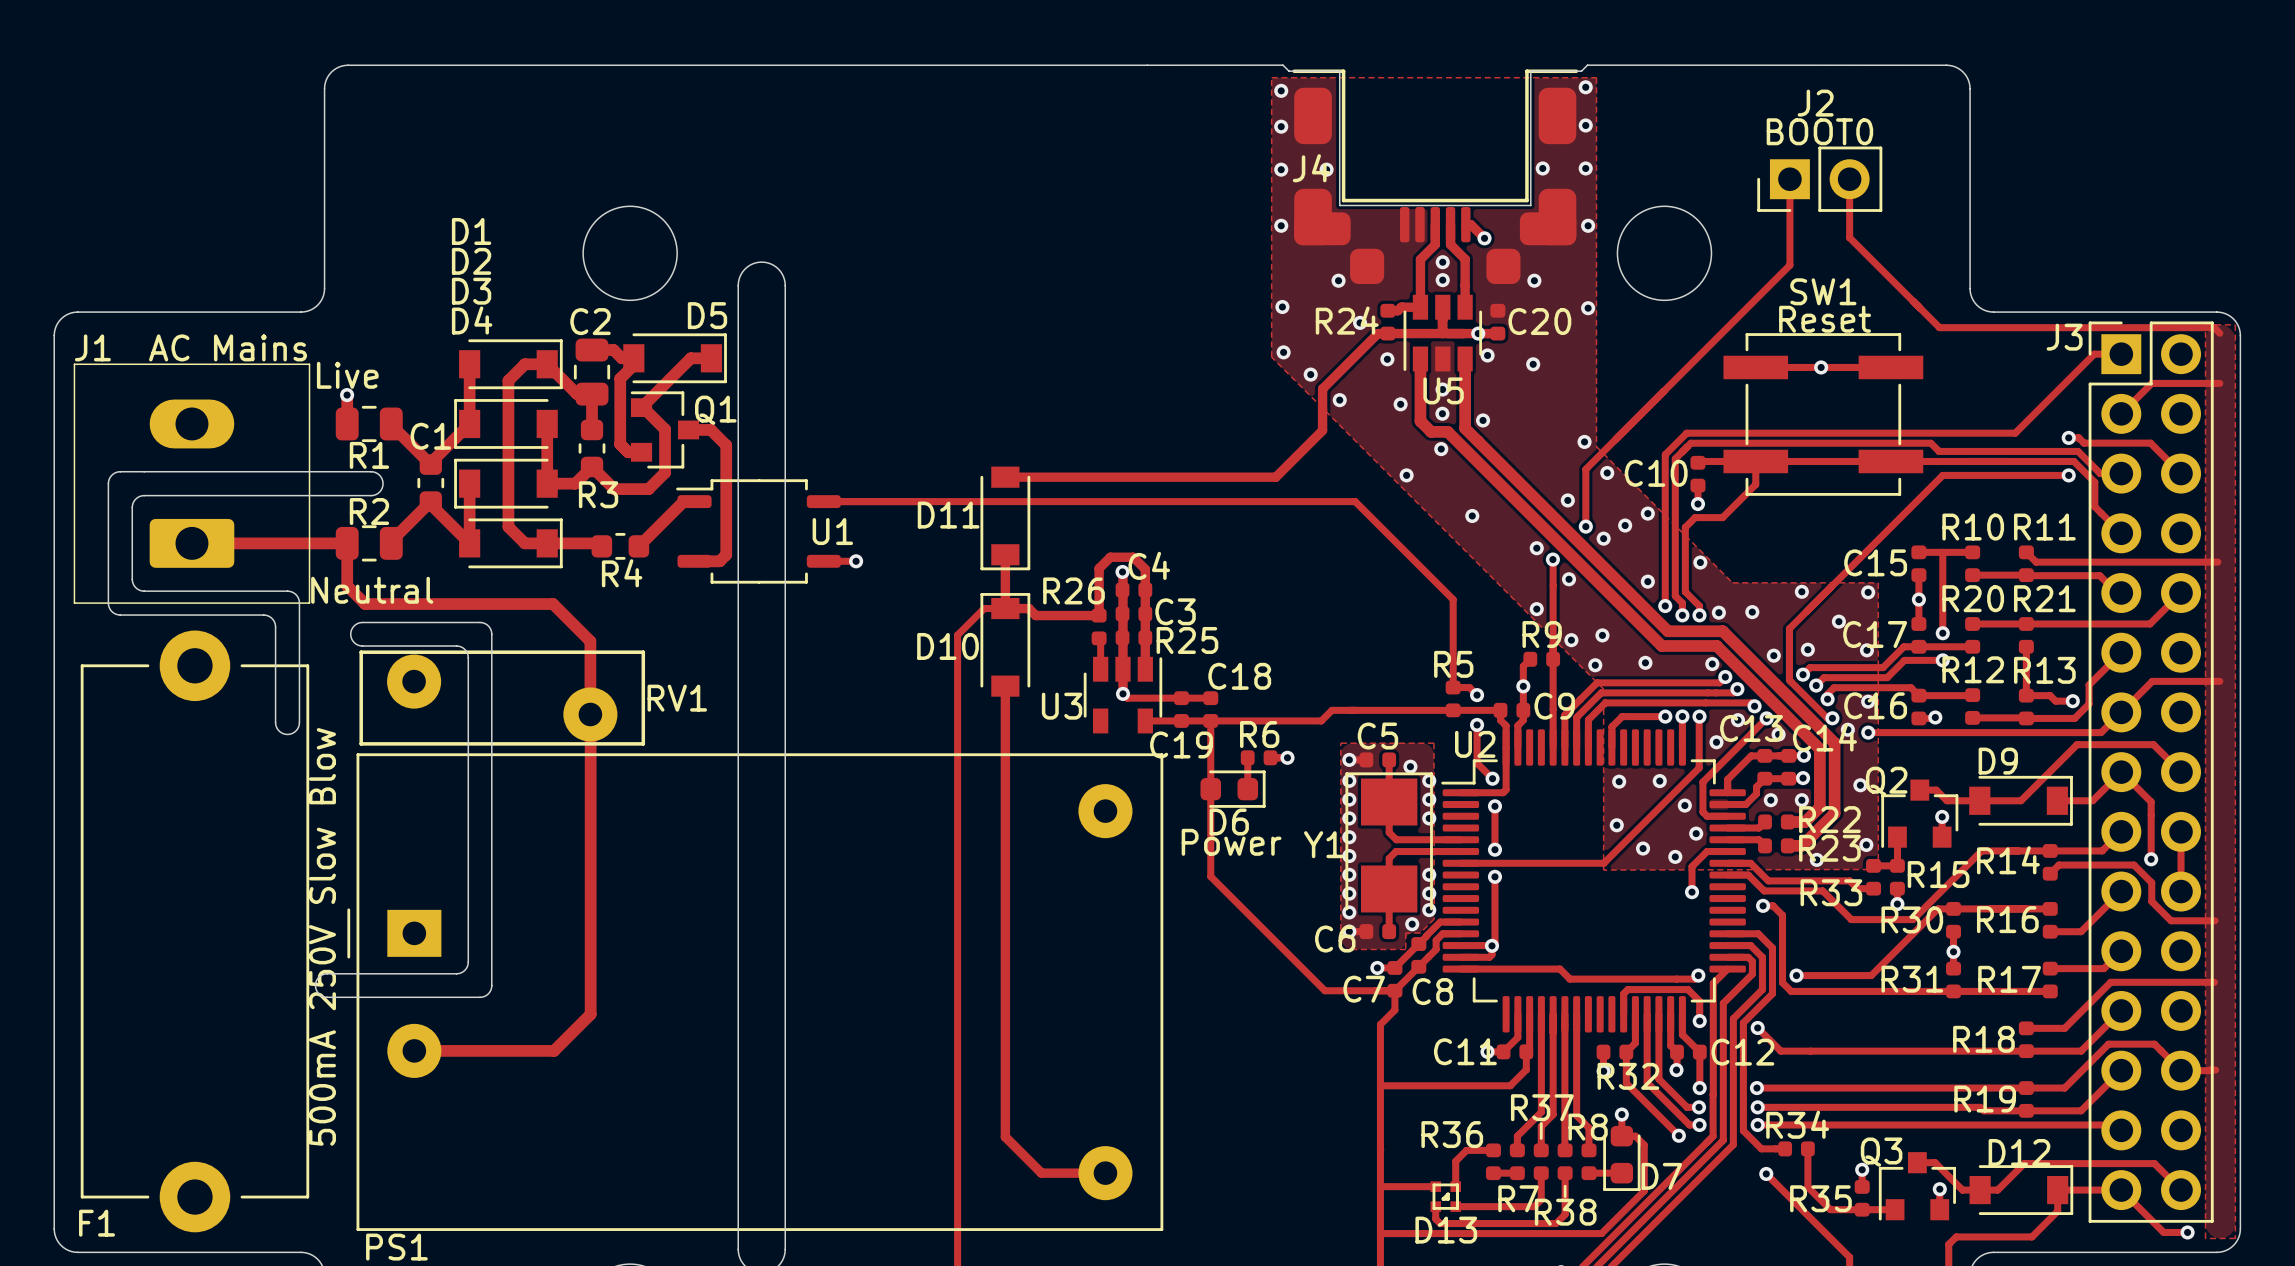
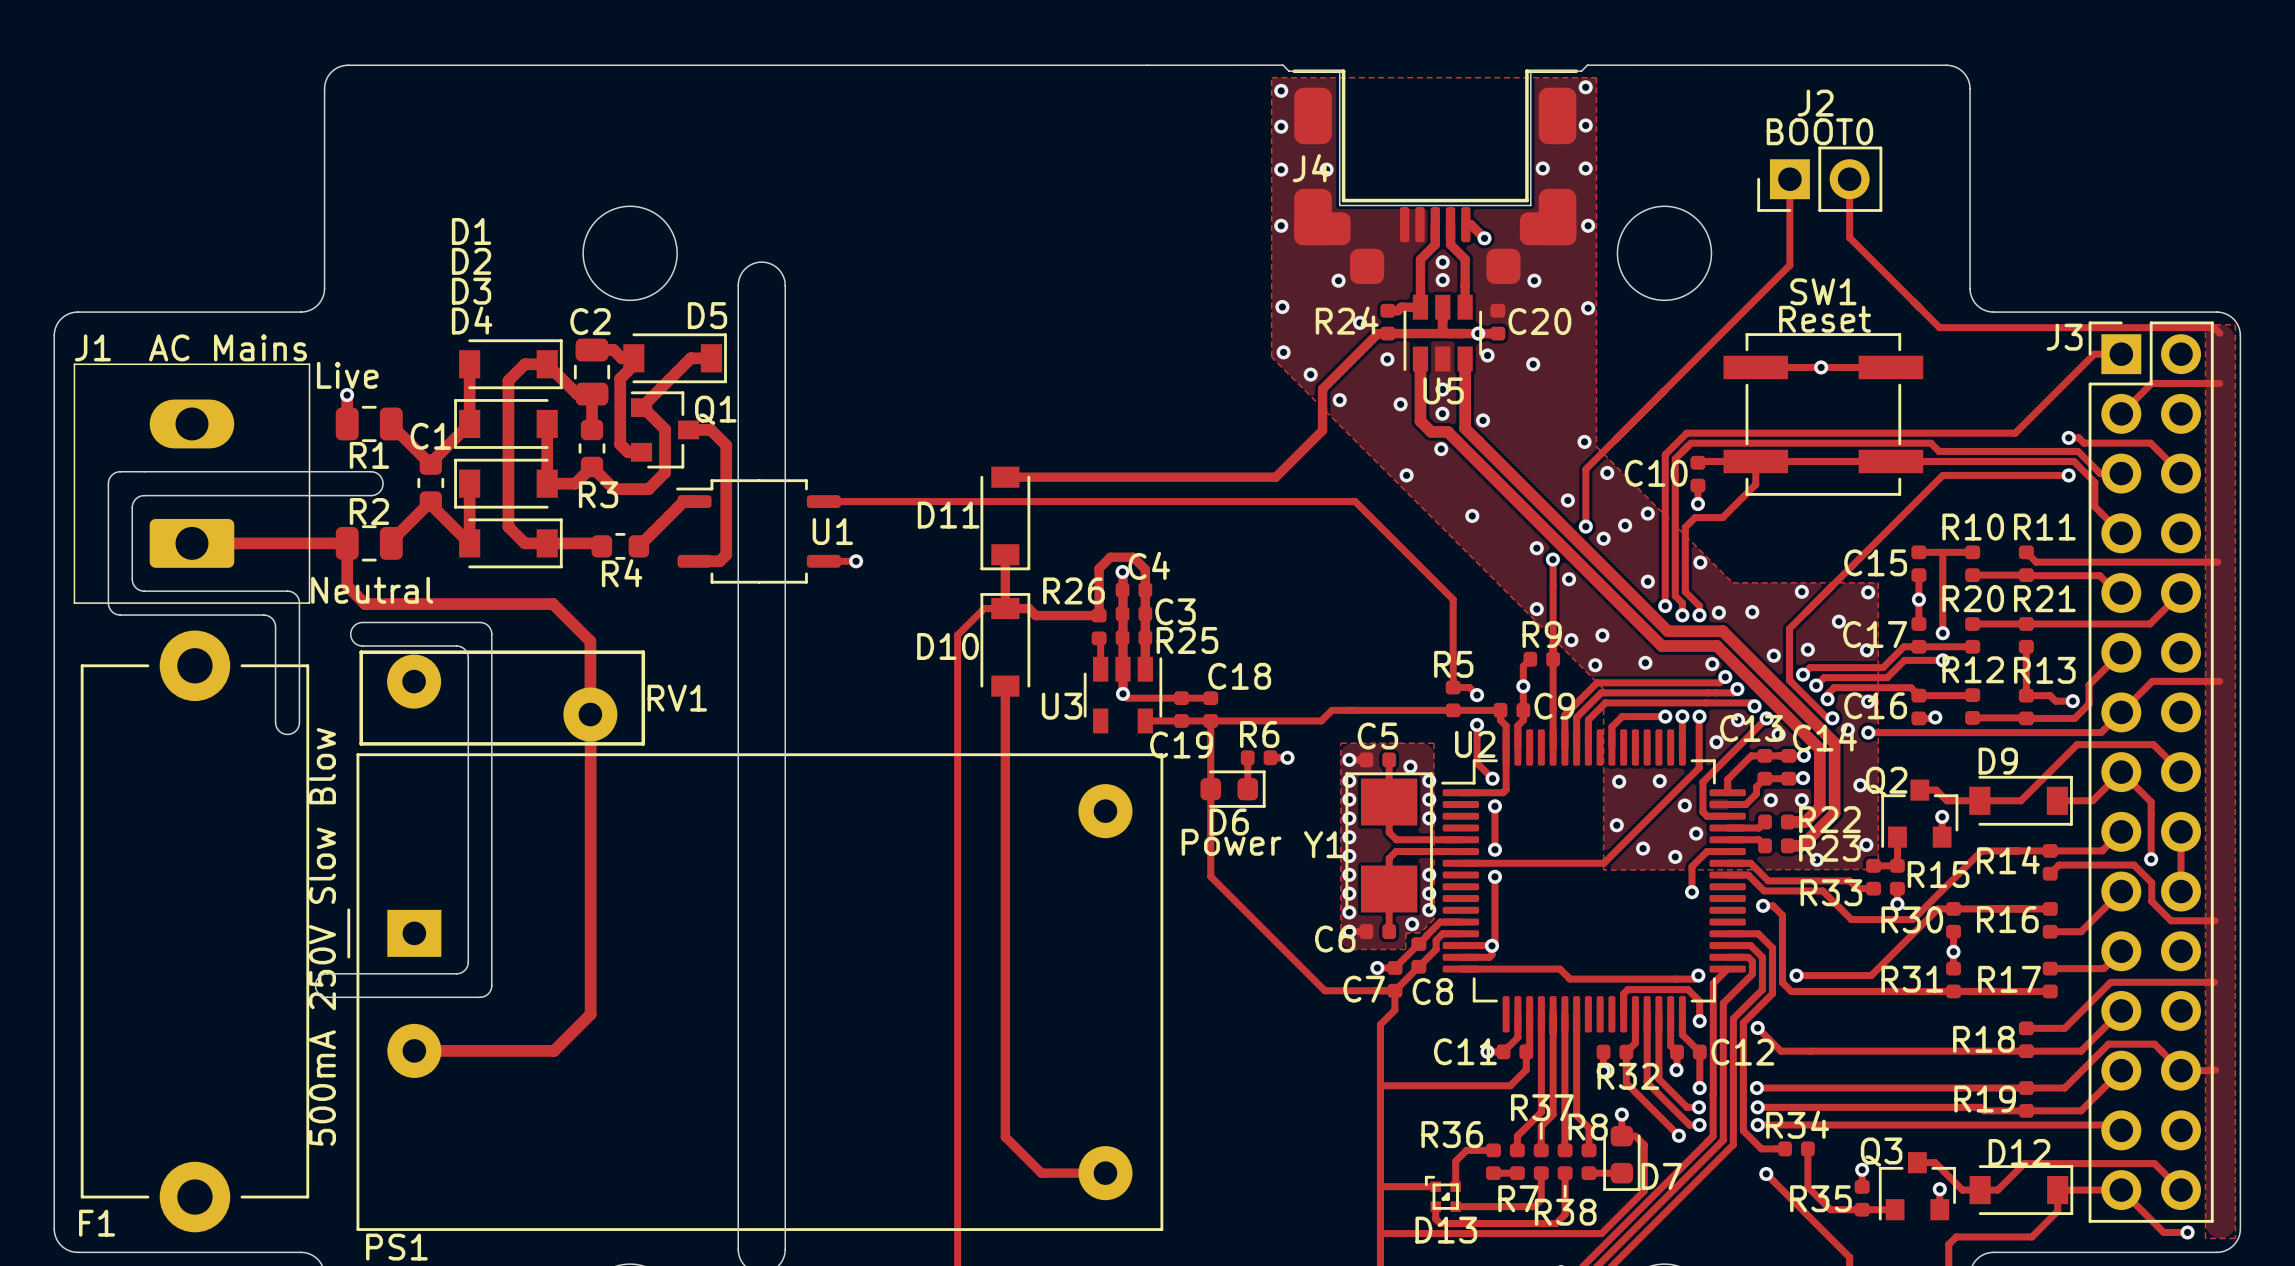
line: none -> (1433, 1177) (1426, 1177) (1426, 1184)

